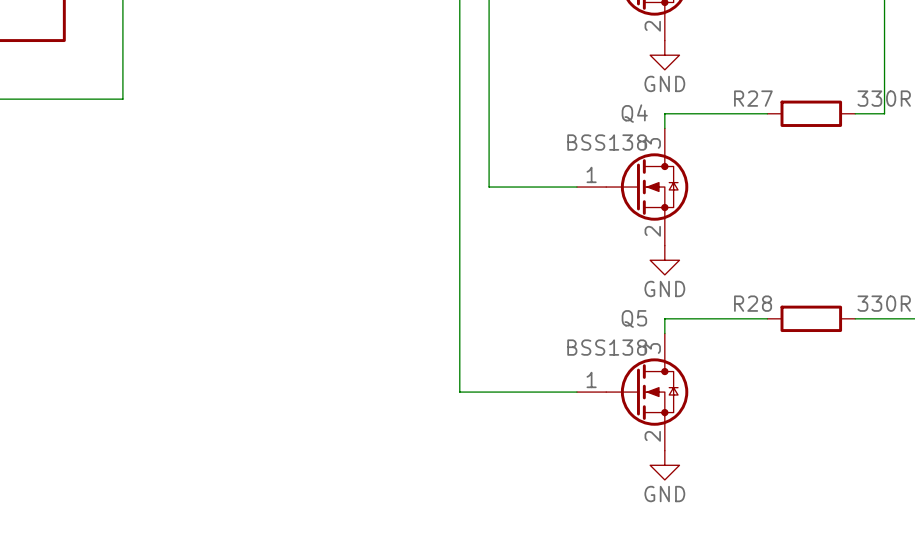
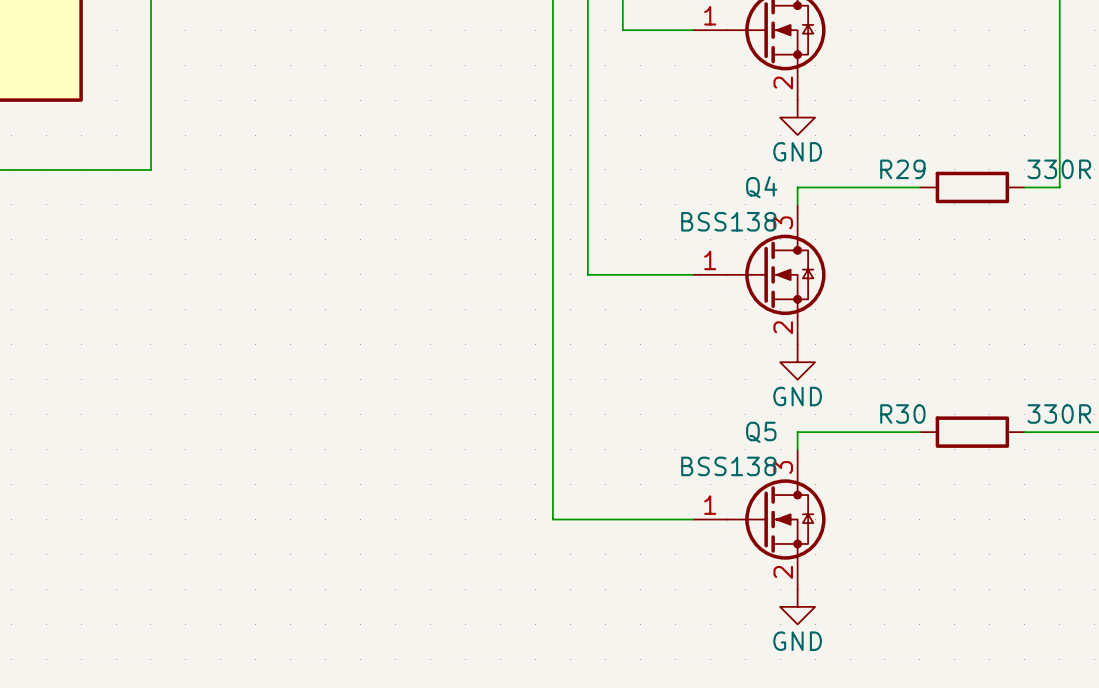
R27 name: R27 (753, 98) -> R29 (902, 169)
R28 name: R28 (753, 303) -> R30 (902, 414)

